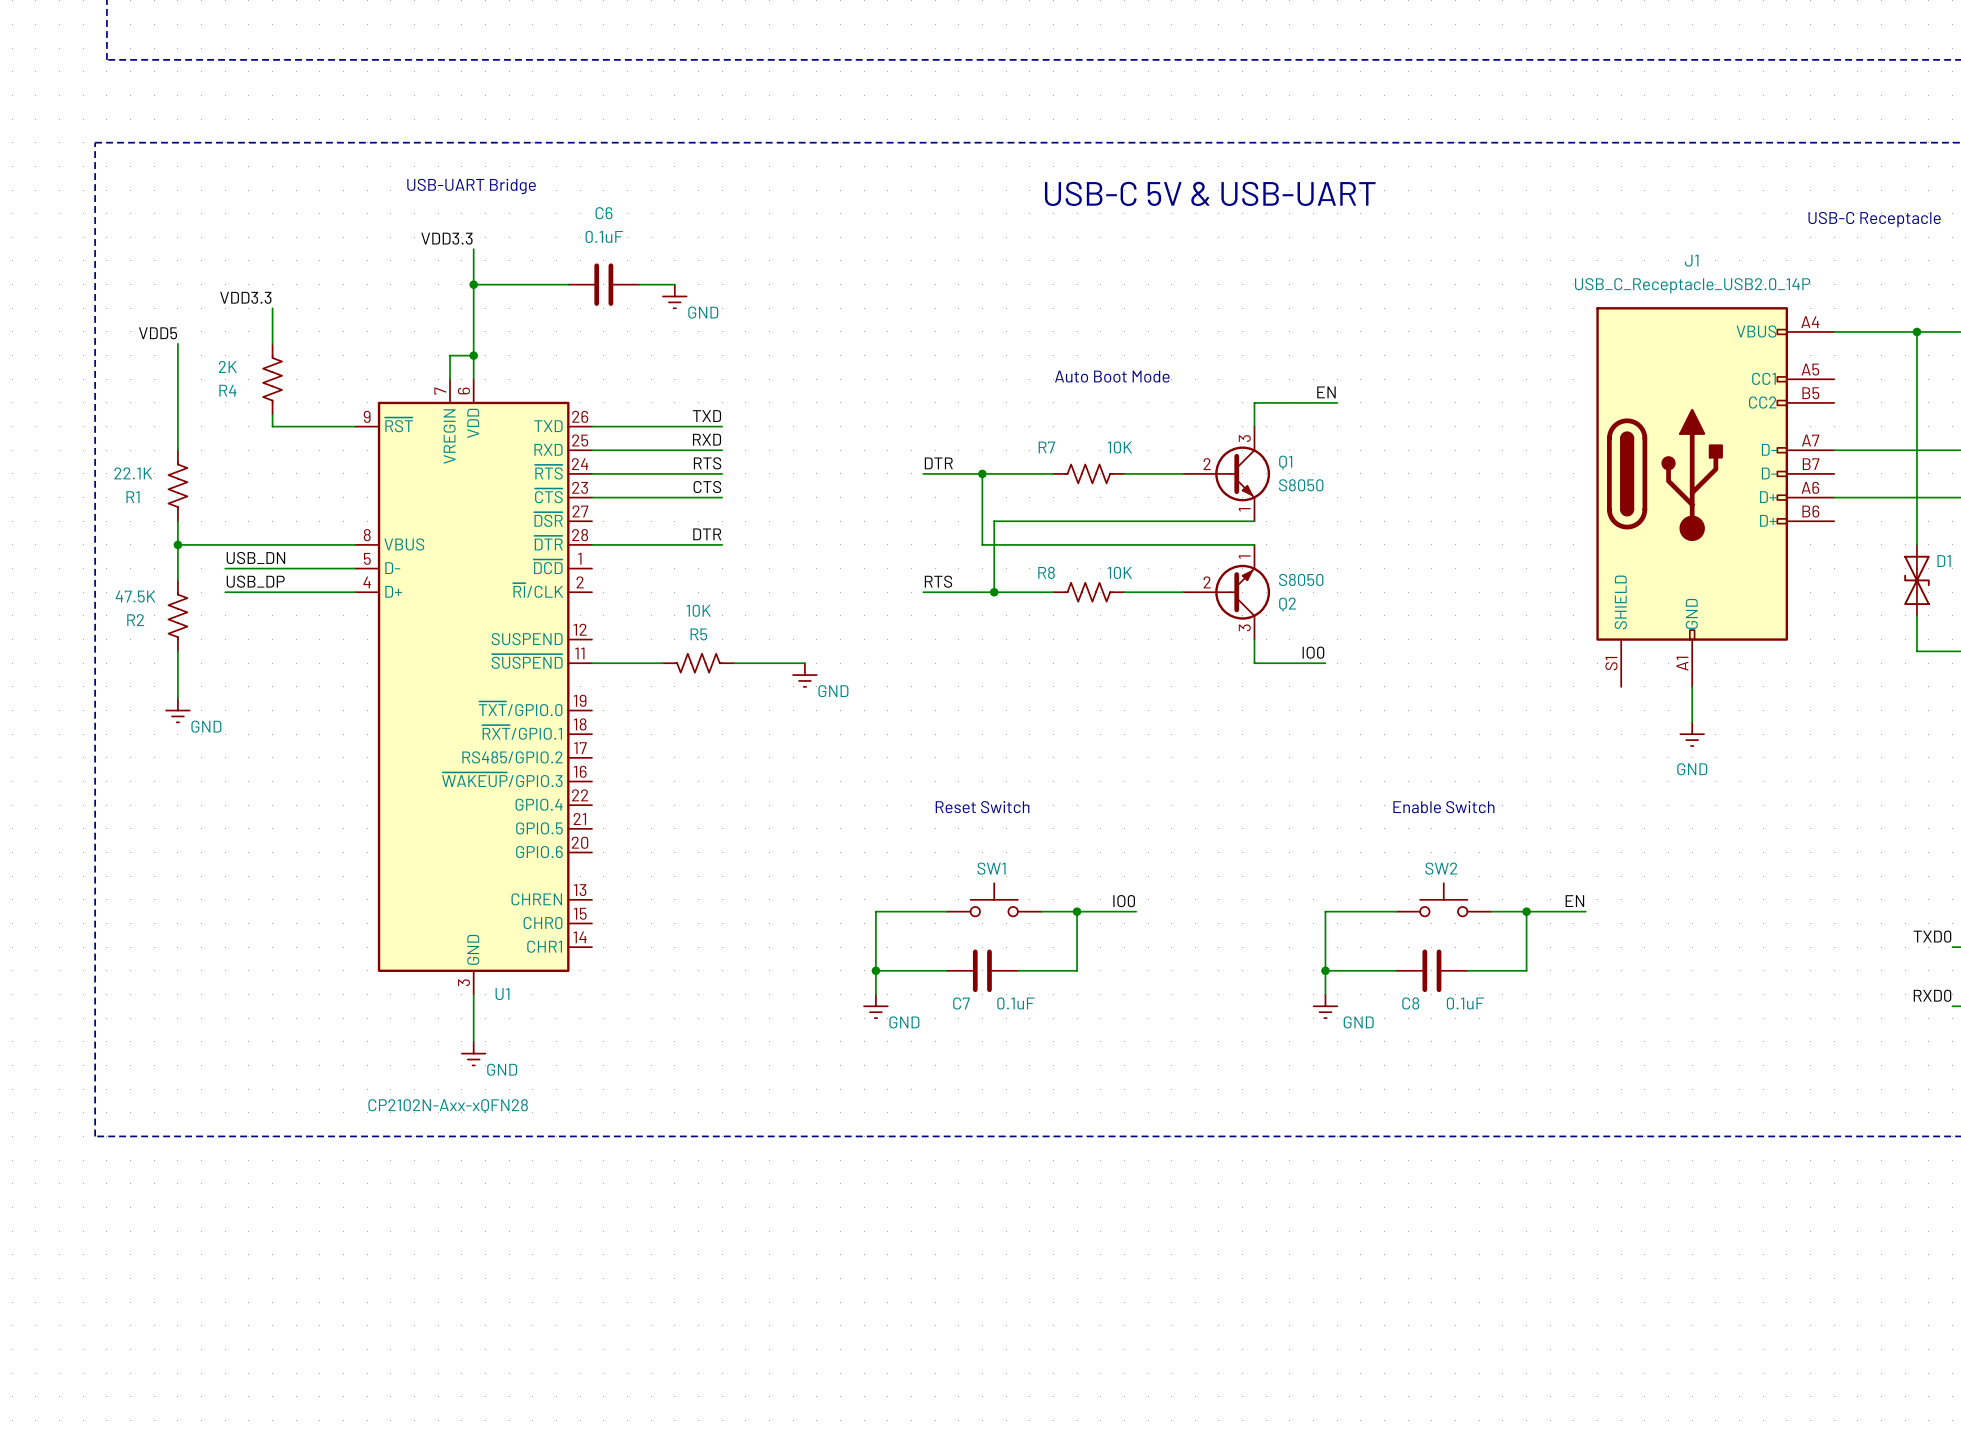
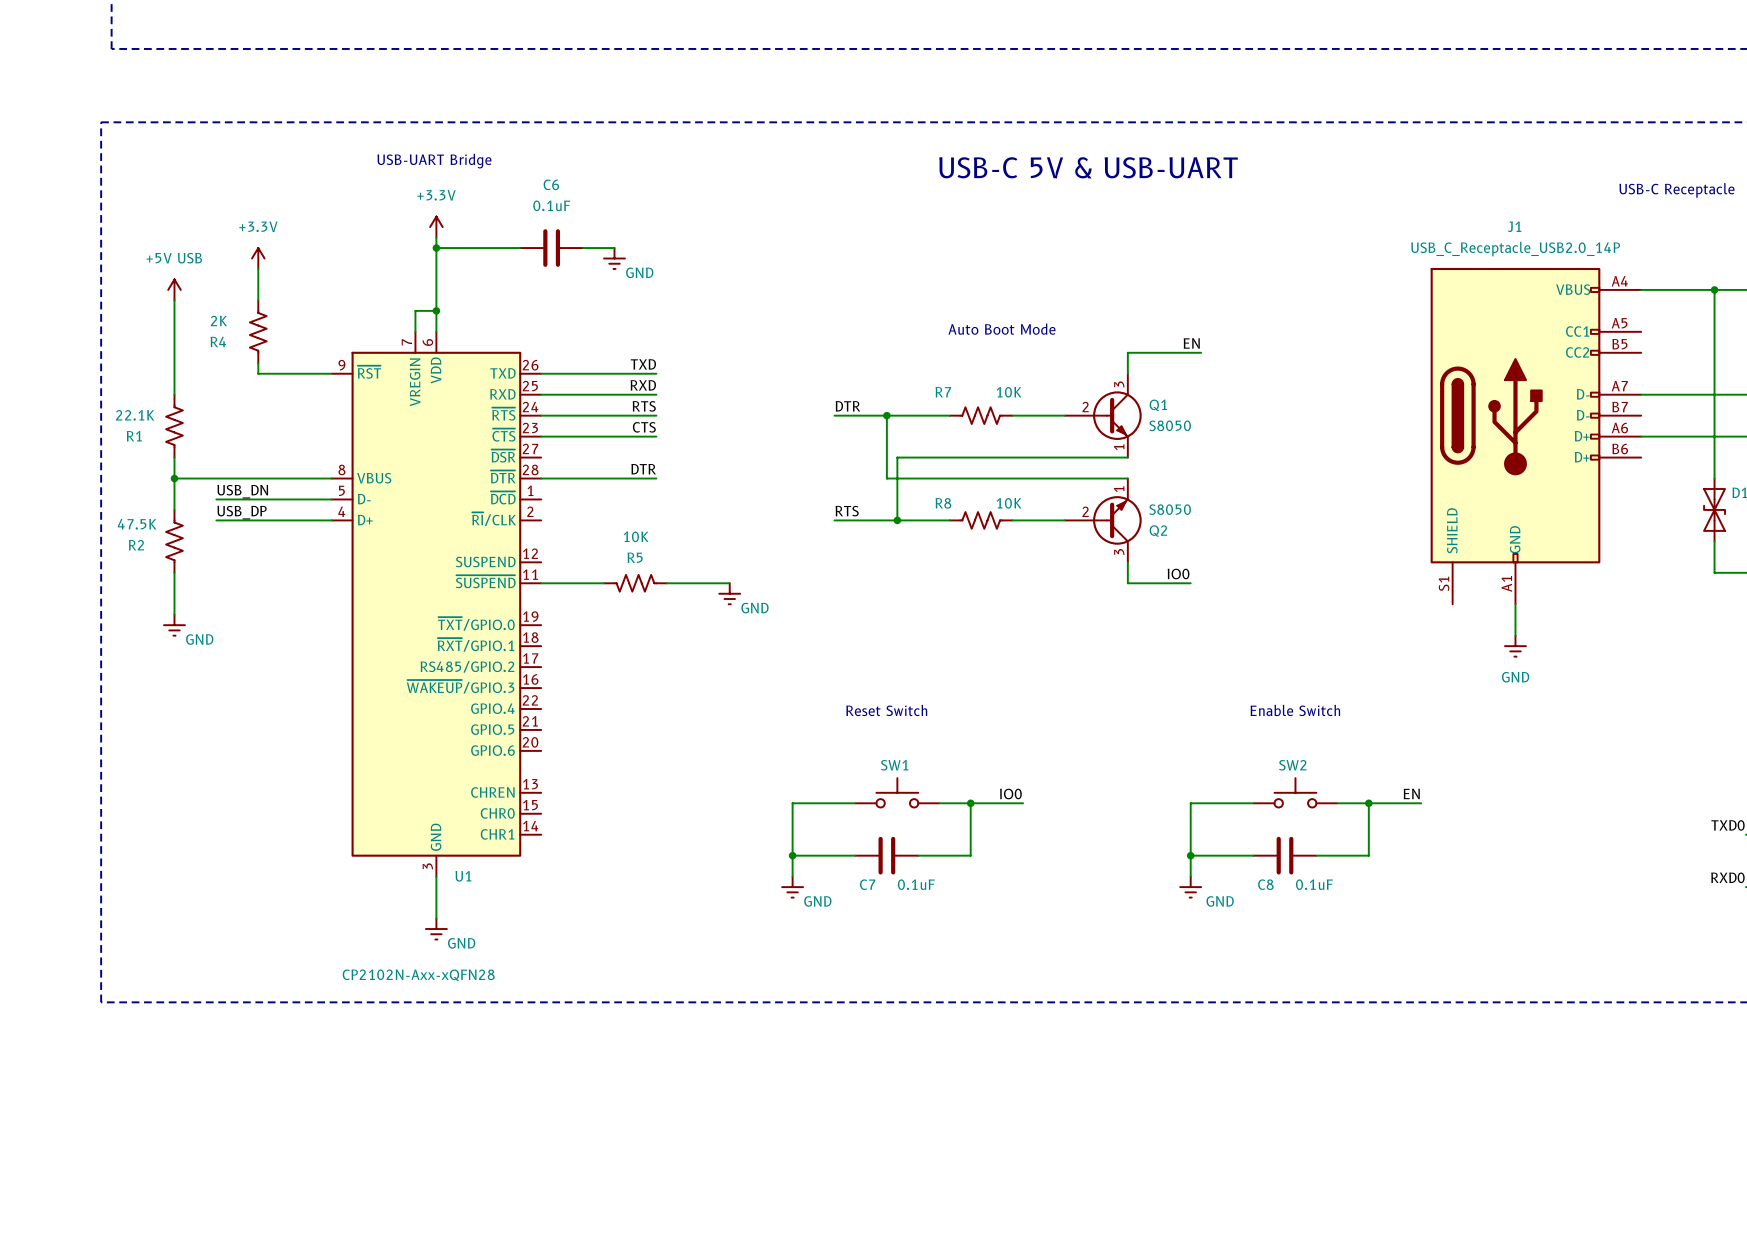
label: VDD3.3 (446, 238) -> none
power symbol: none -> +3.3V (436, 227)
power symbol: none -> +3.3V (258, 258)
label: VDD3.3 (245, 297) -> none
power symbol: none -> +5V USB (174, 289)
label: VDD5 (158, 333) -> none

